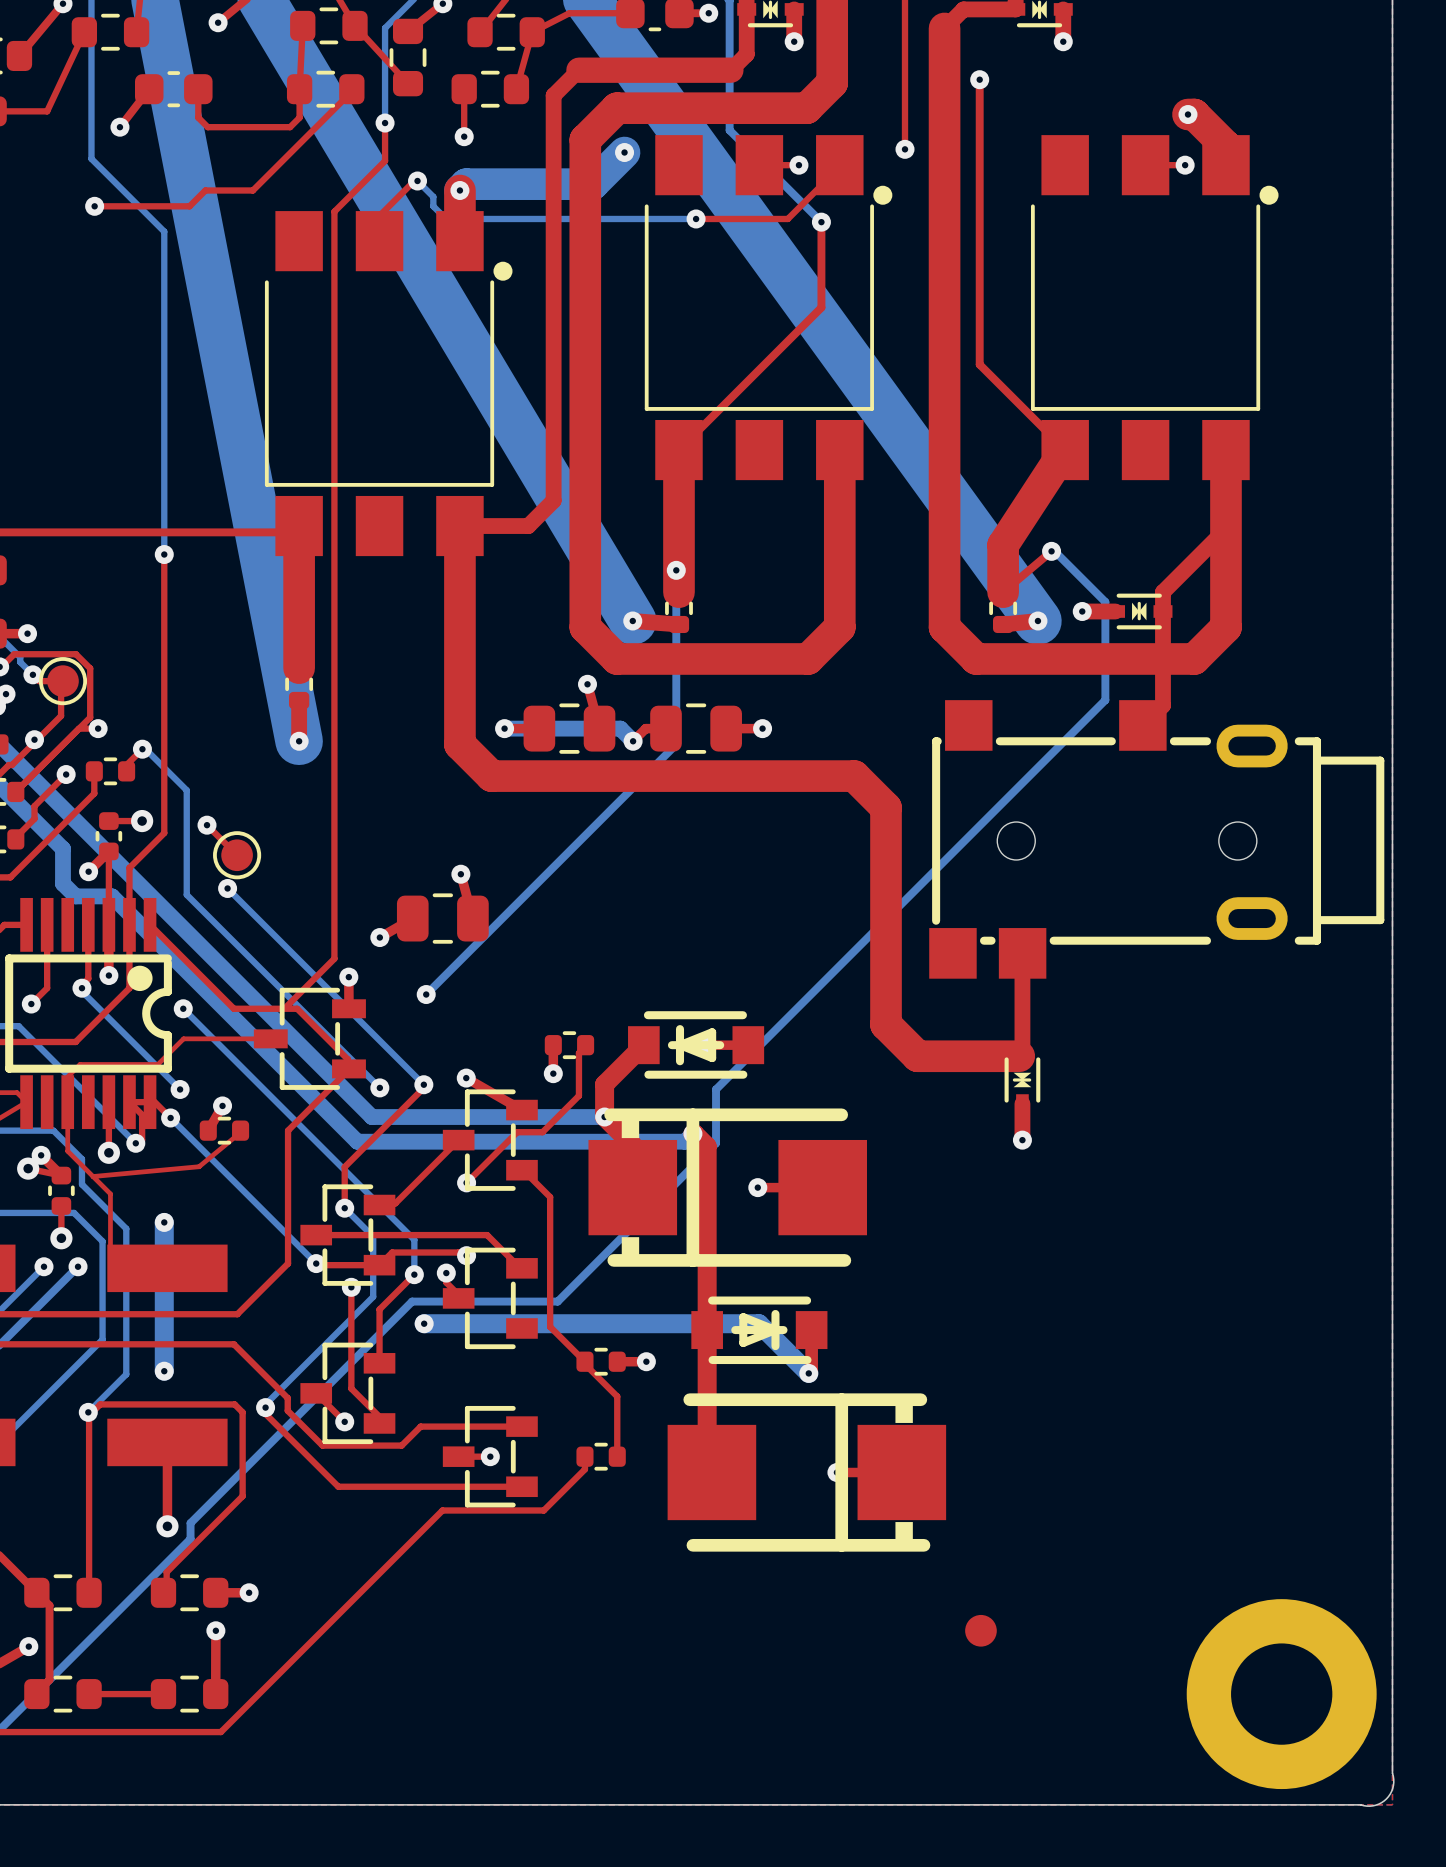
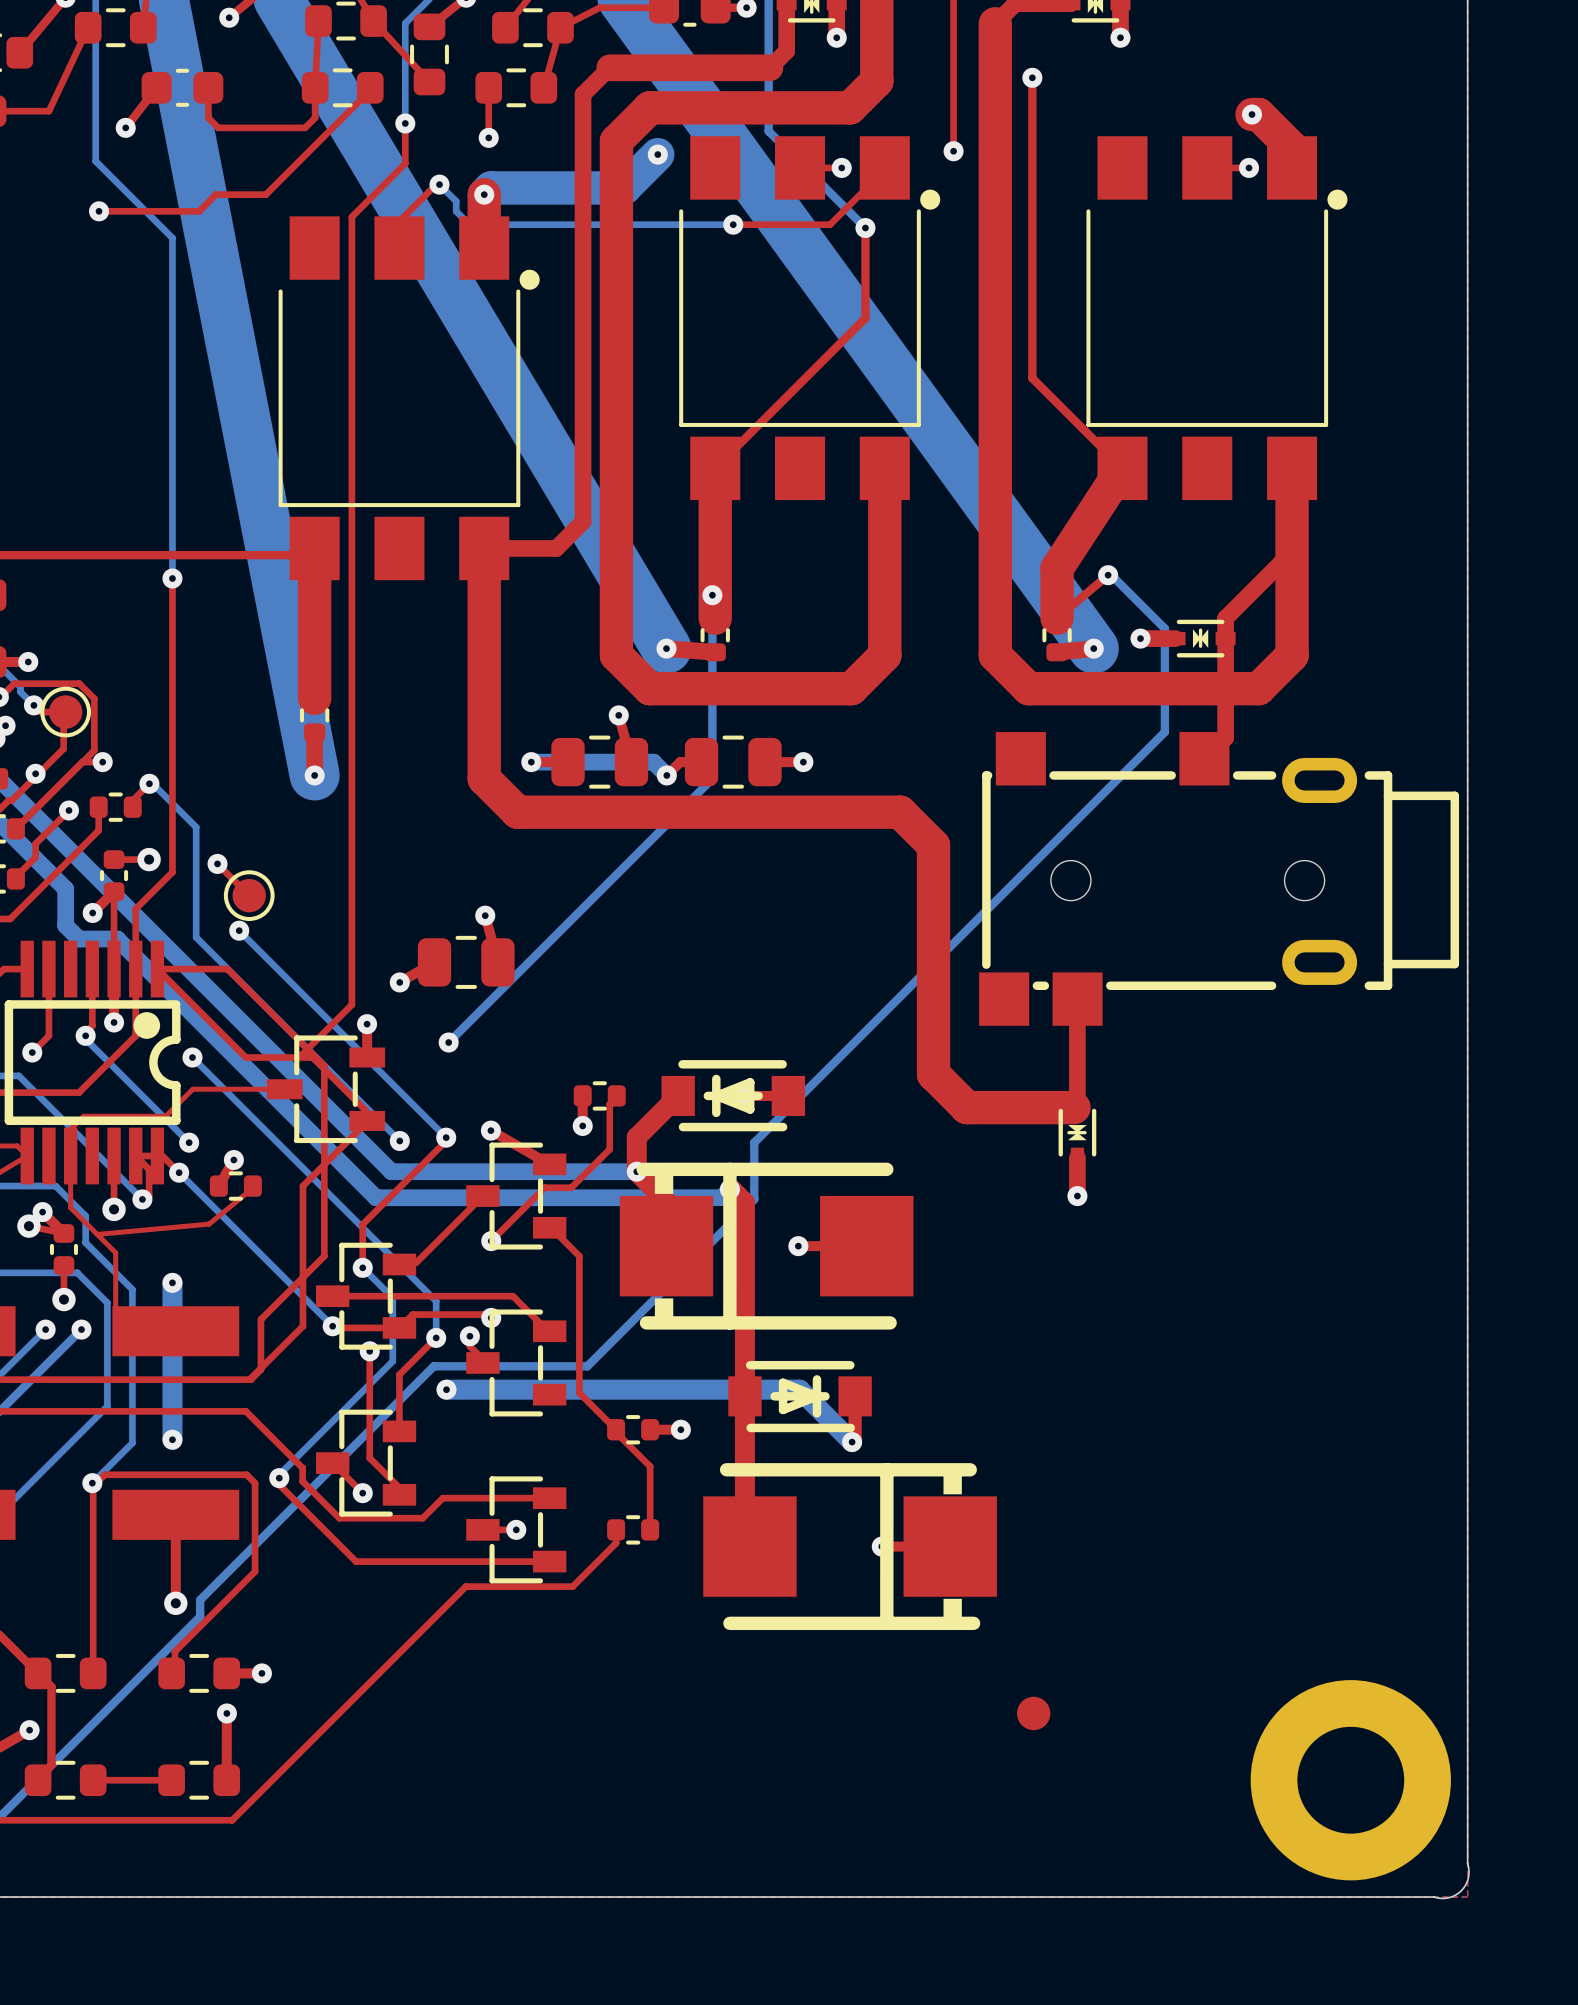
top track: none -> (158, 969) (227, 969) (324, 1065) (324, 1256) (260, 1319) (260, 1369) (249, 1379)

